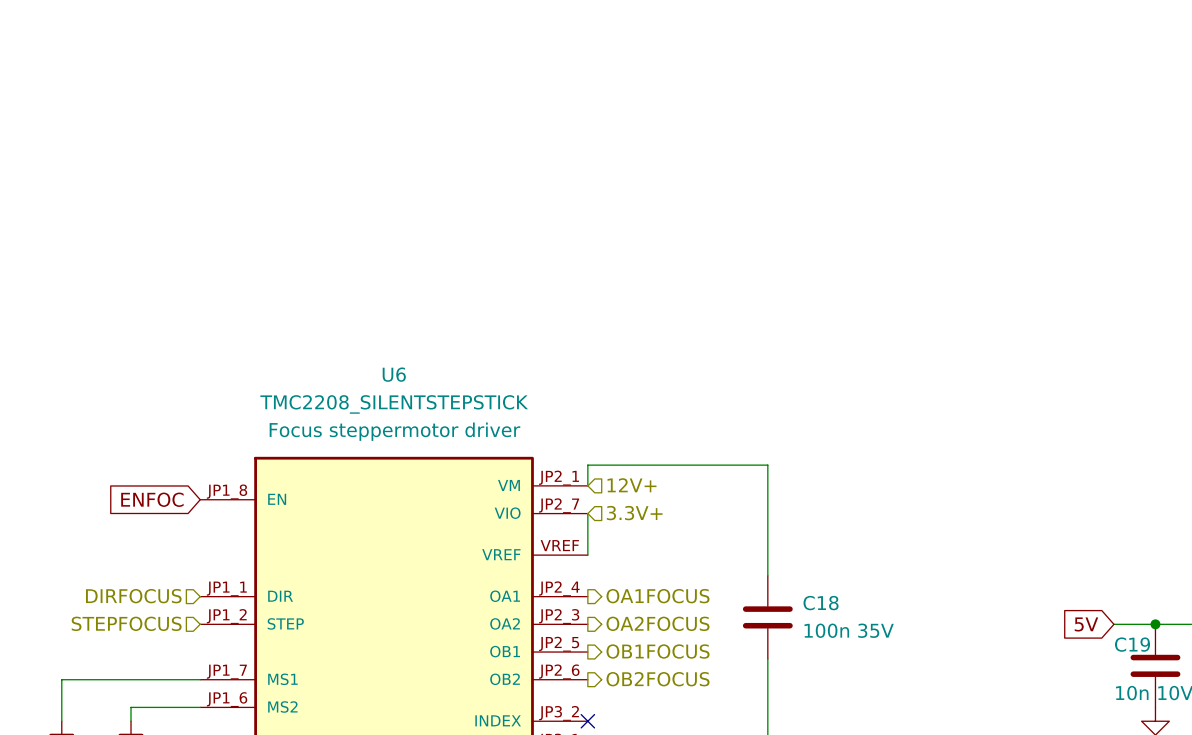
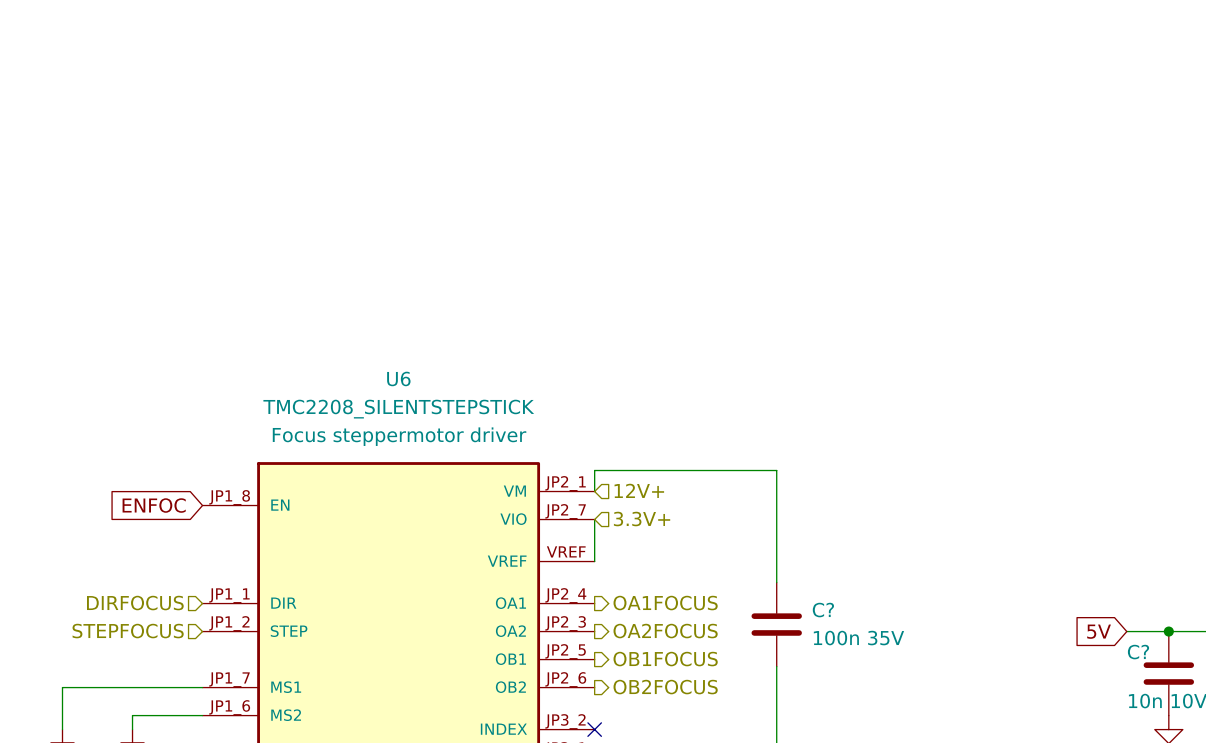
C18 name: C18 (821, 603) -> C? (823, 610)
C19 name: C19 (1132, 644) -> C? (1138, 652)

